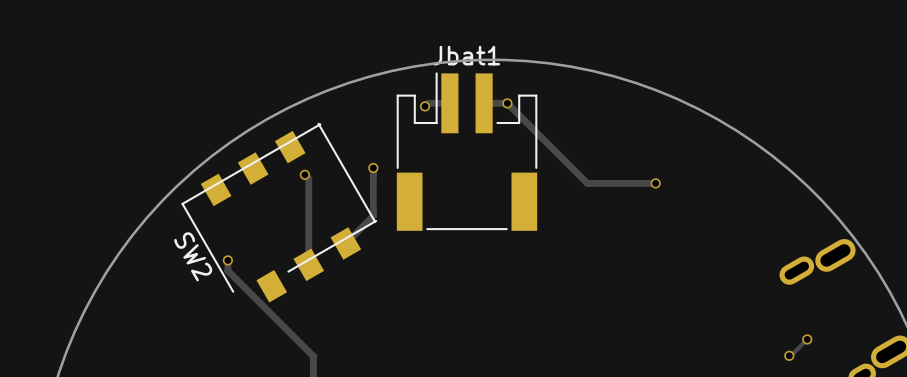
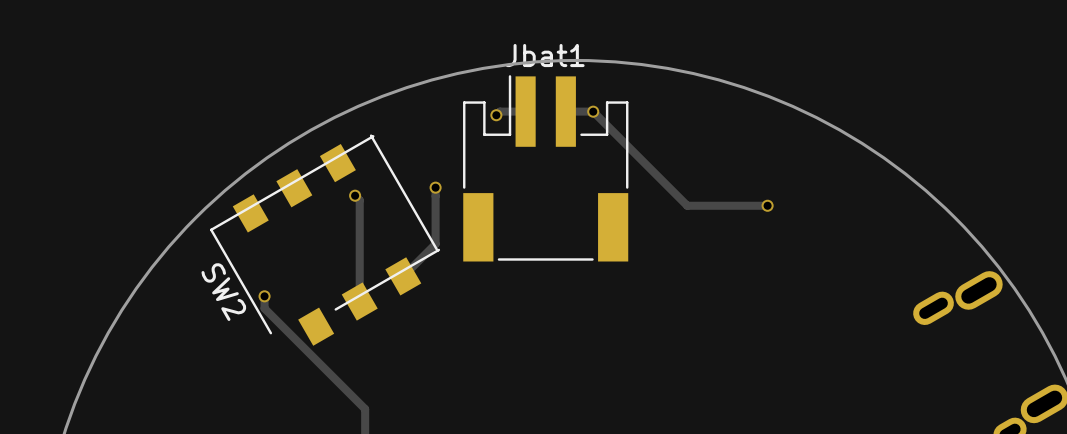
track: (807, 339) (789, 355) -> none
via: (807, 339) -> none
via: (789, 355) -> none

